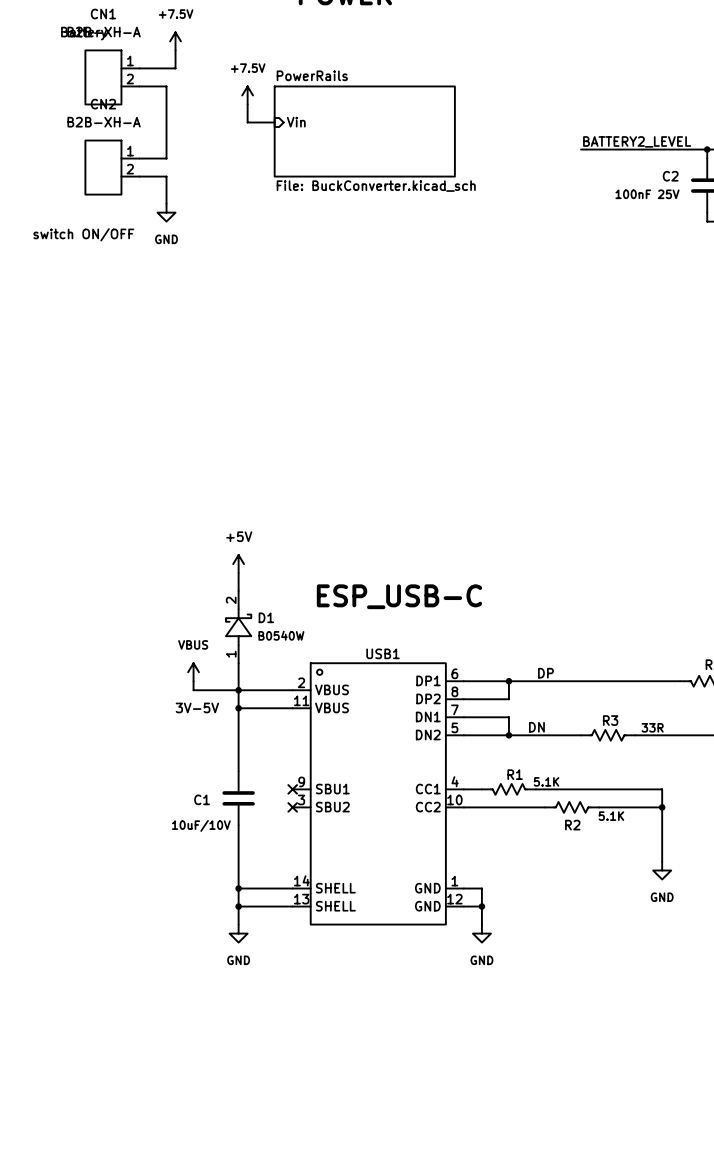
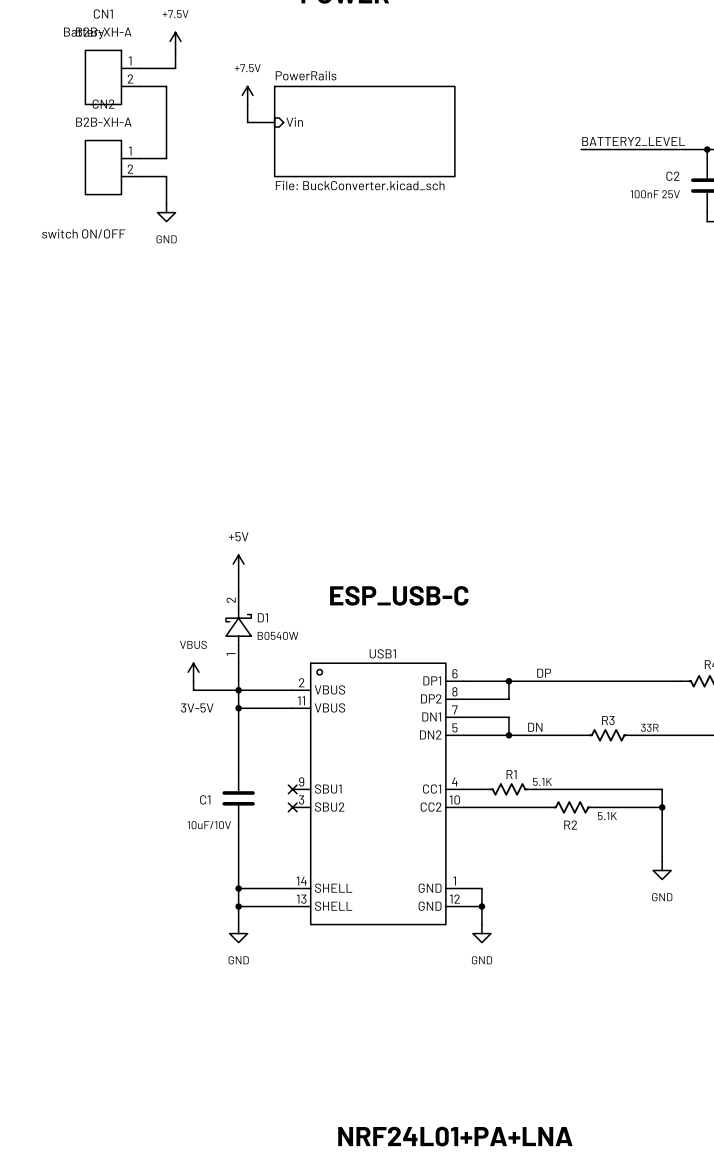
text: none -> NRF24L01+PA+LNA (455, 1136)

